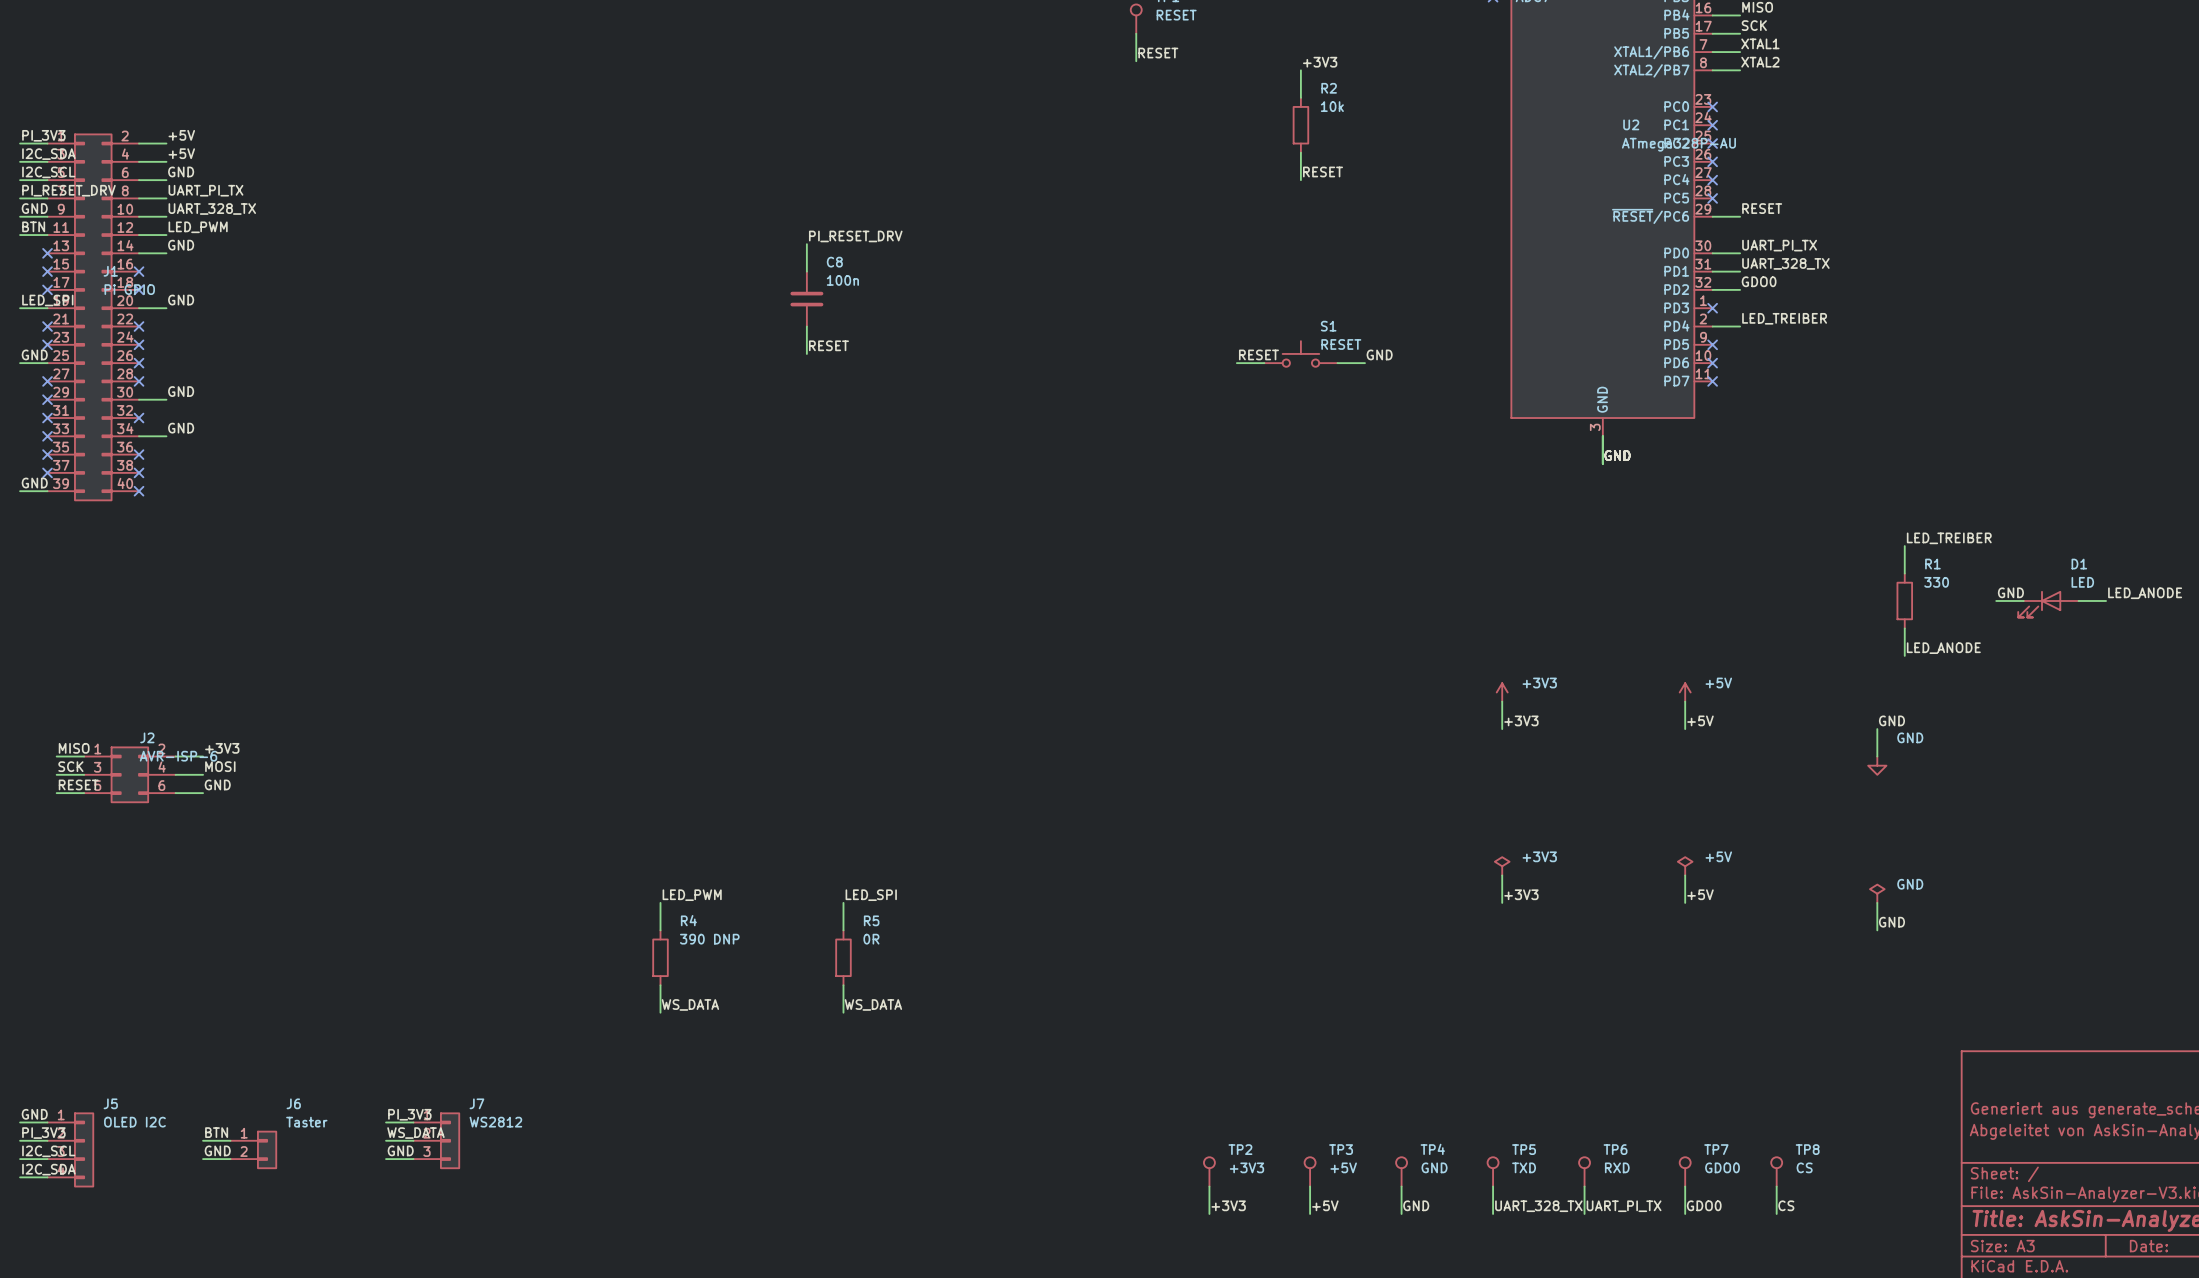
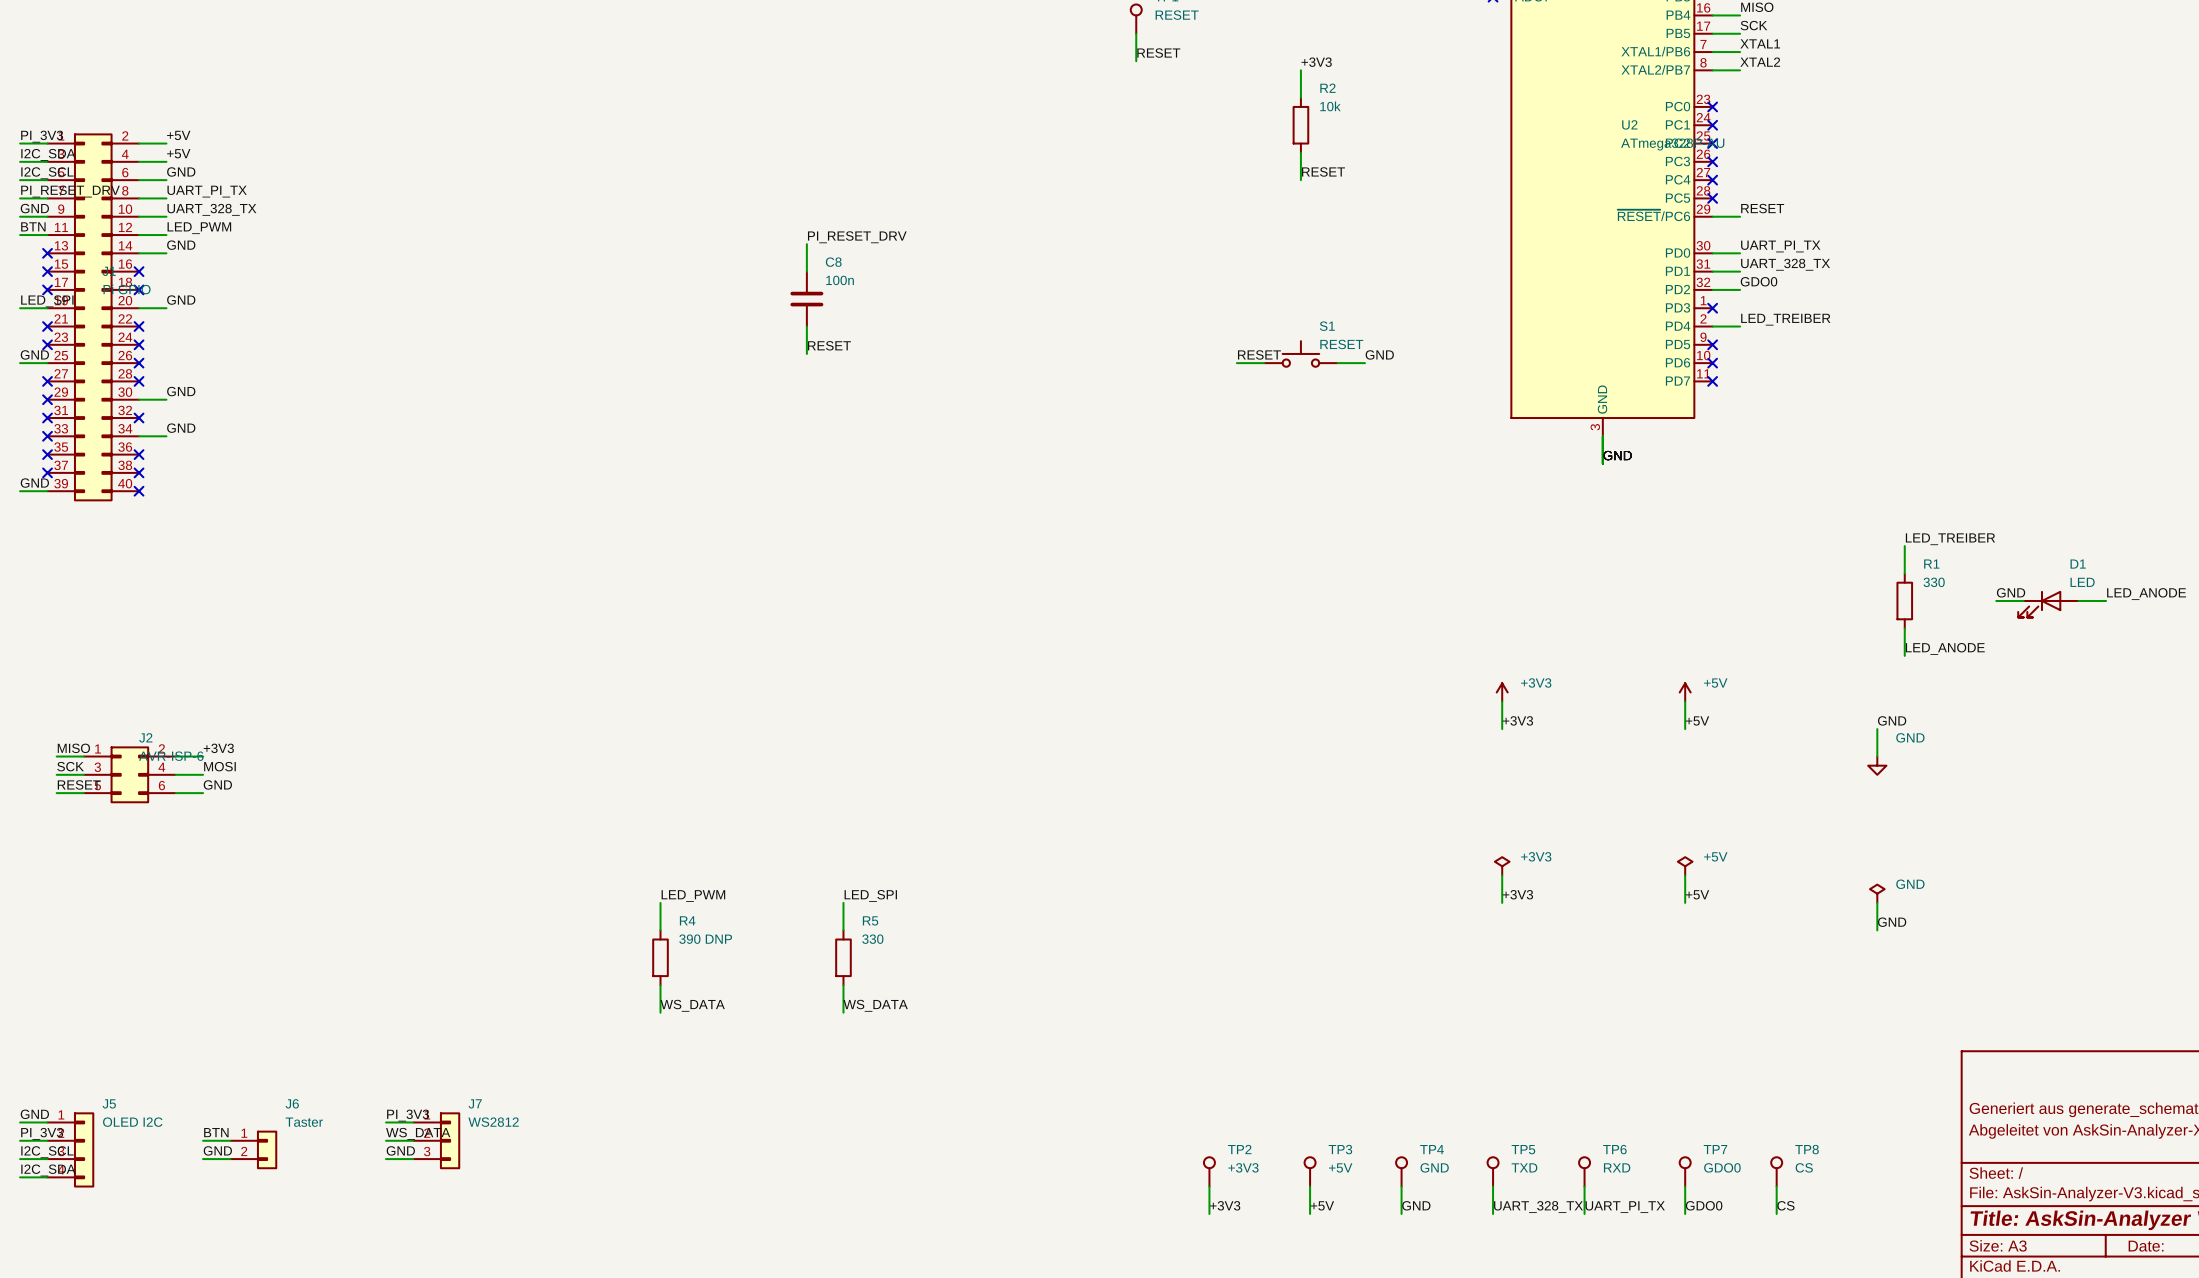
R5 value: 0R (871, 939) -> 330 (872, 939)

